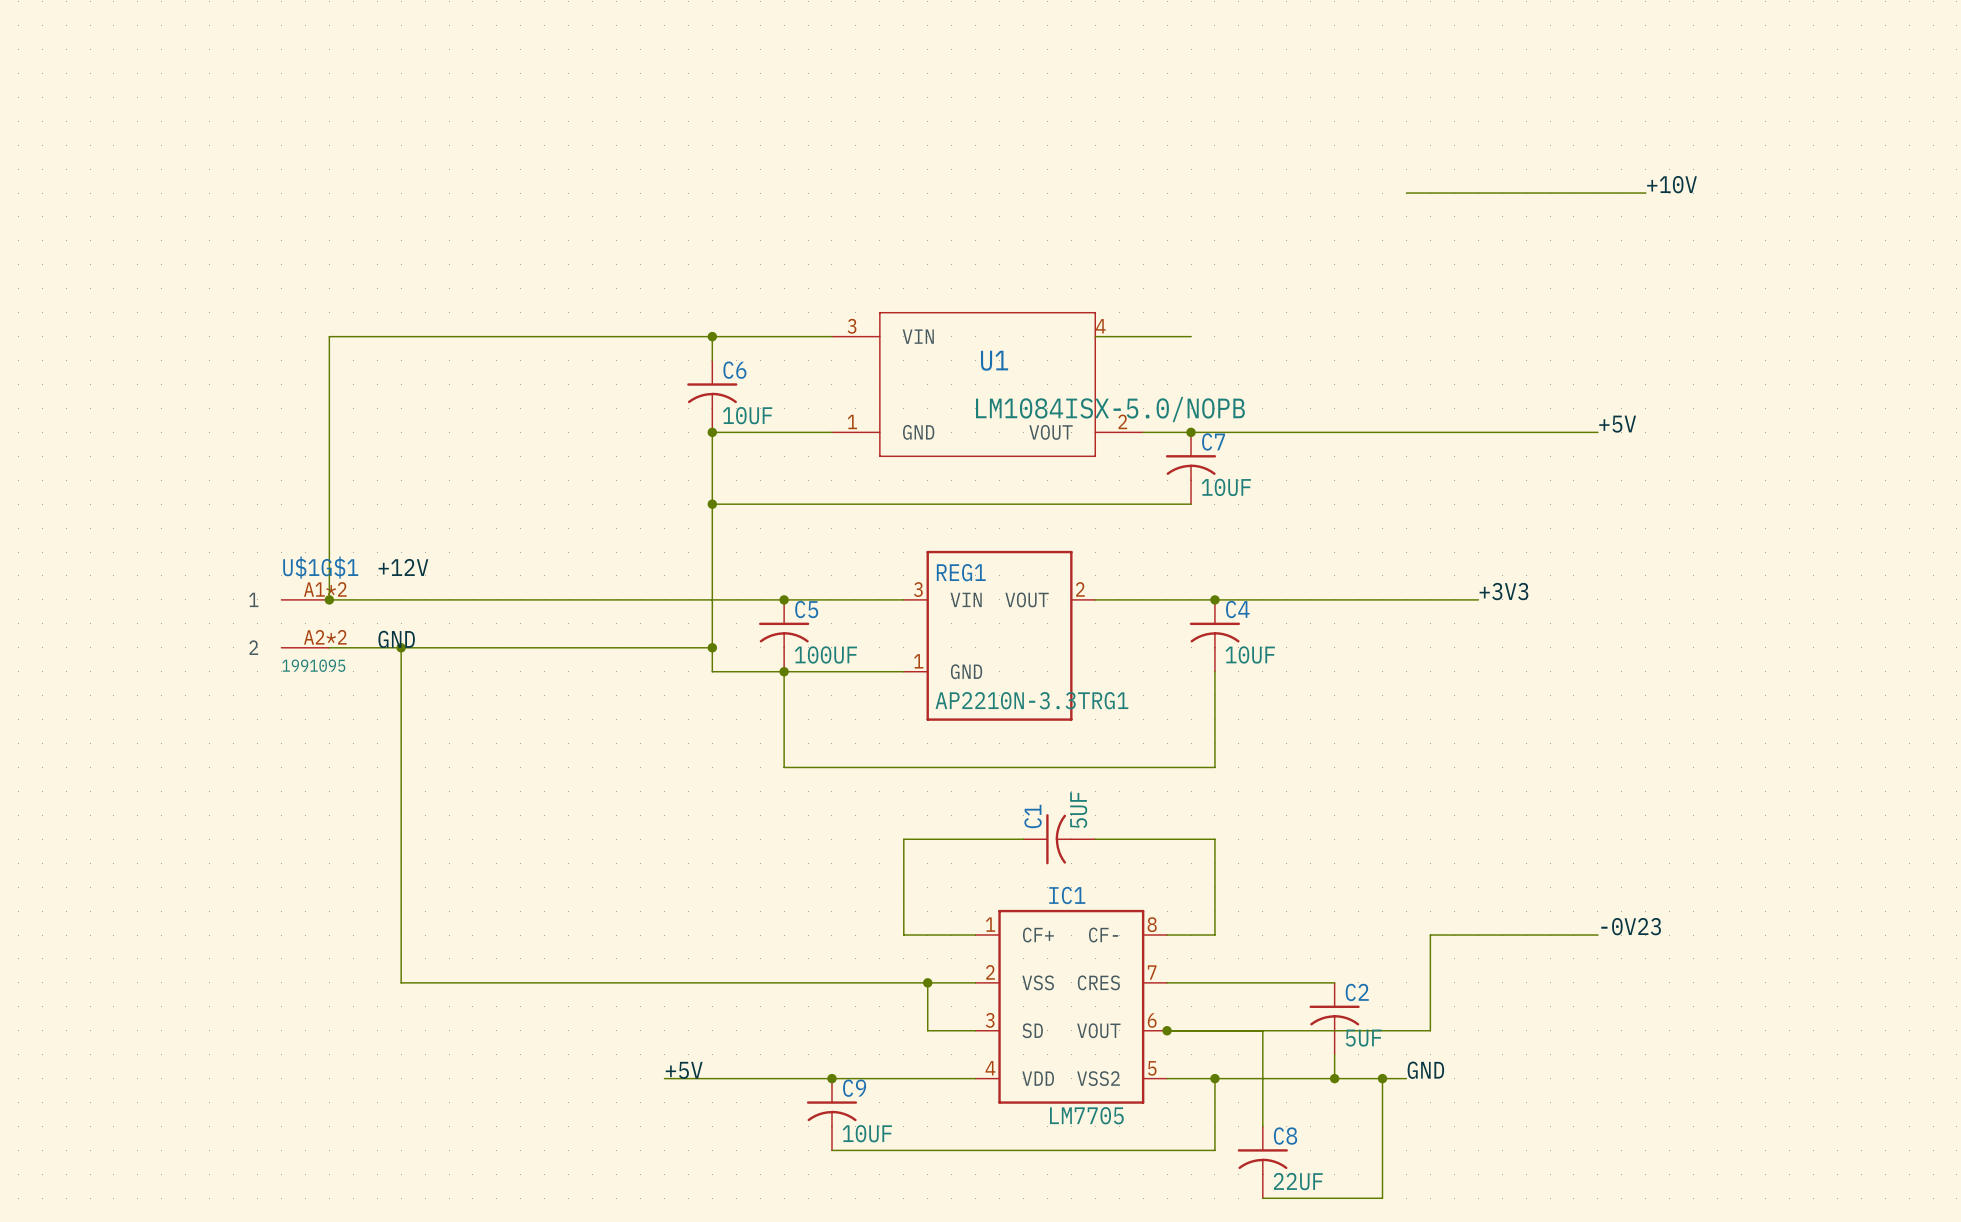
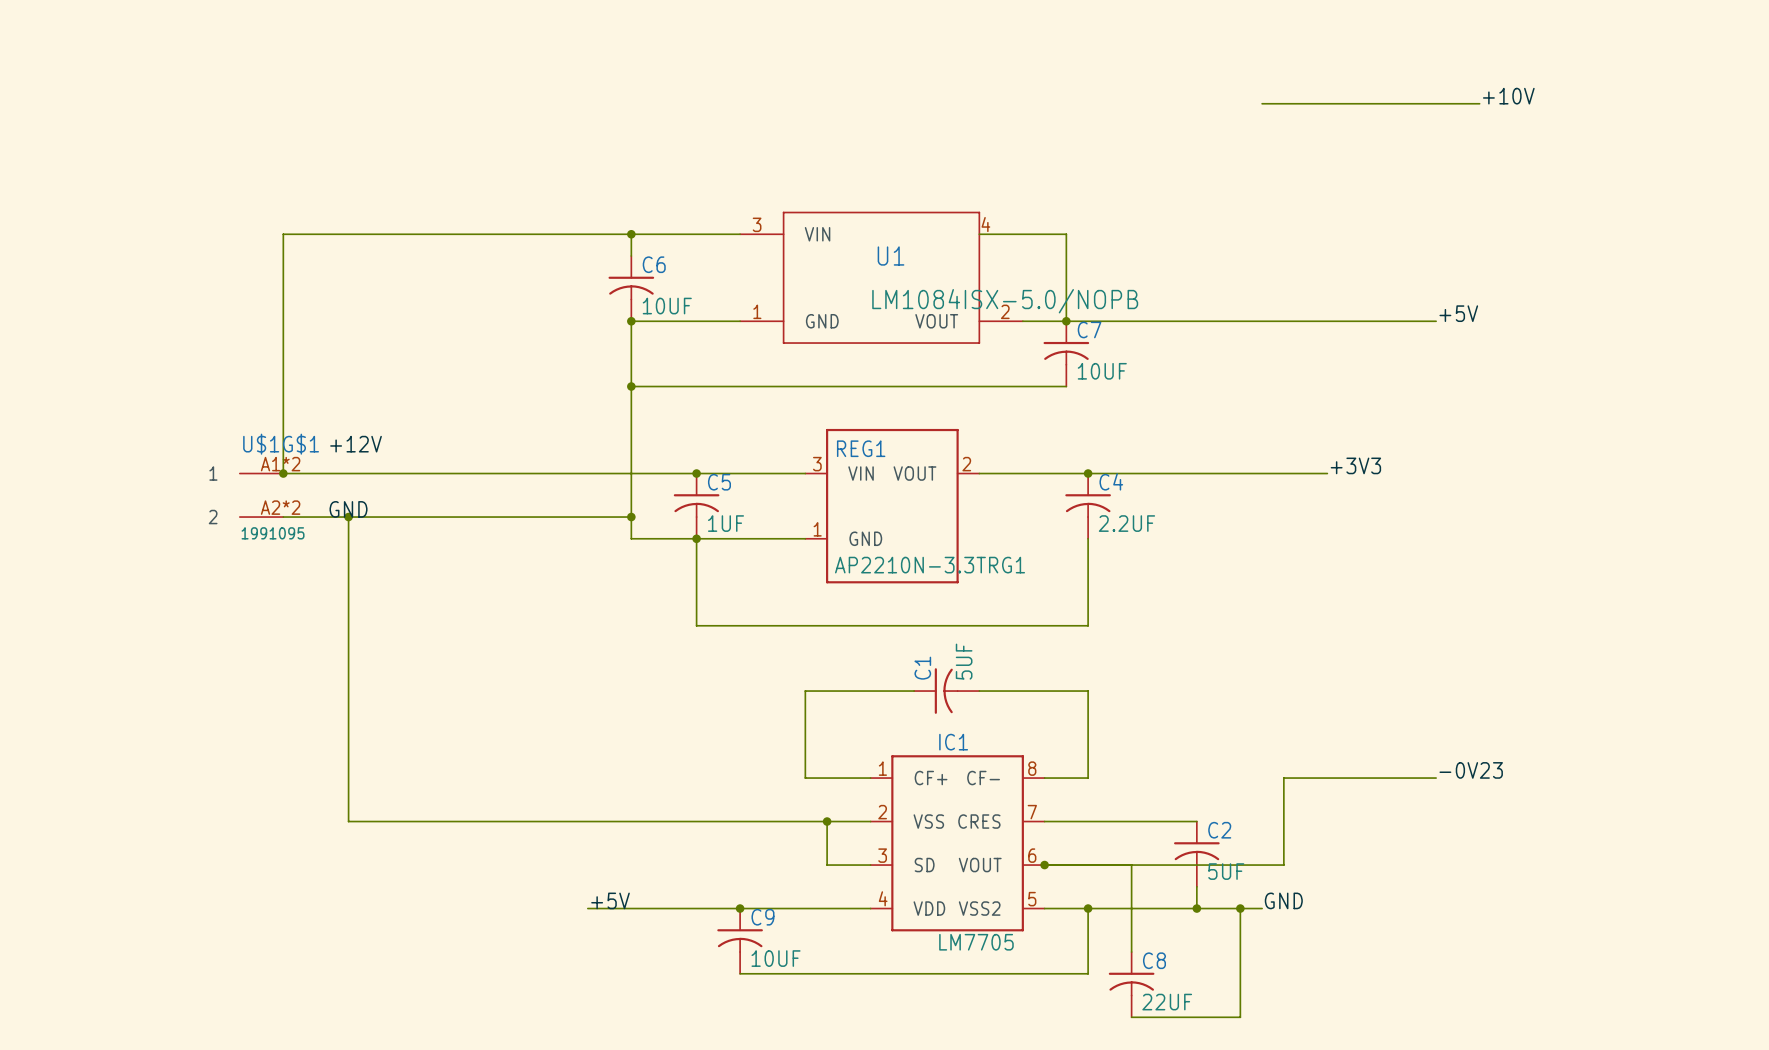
wire: none -> (1066, 234) (1066, 321)
C5 value: 100UF (825, 654) -> 1UF (725, 523)
C4 value: 10UF (1250, 654) -> 2.2UF (1126, 523)

